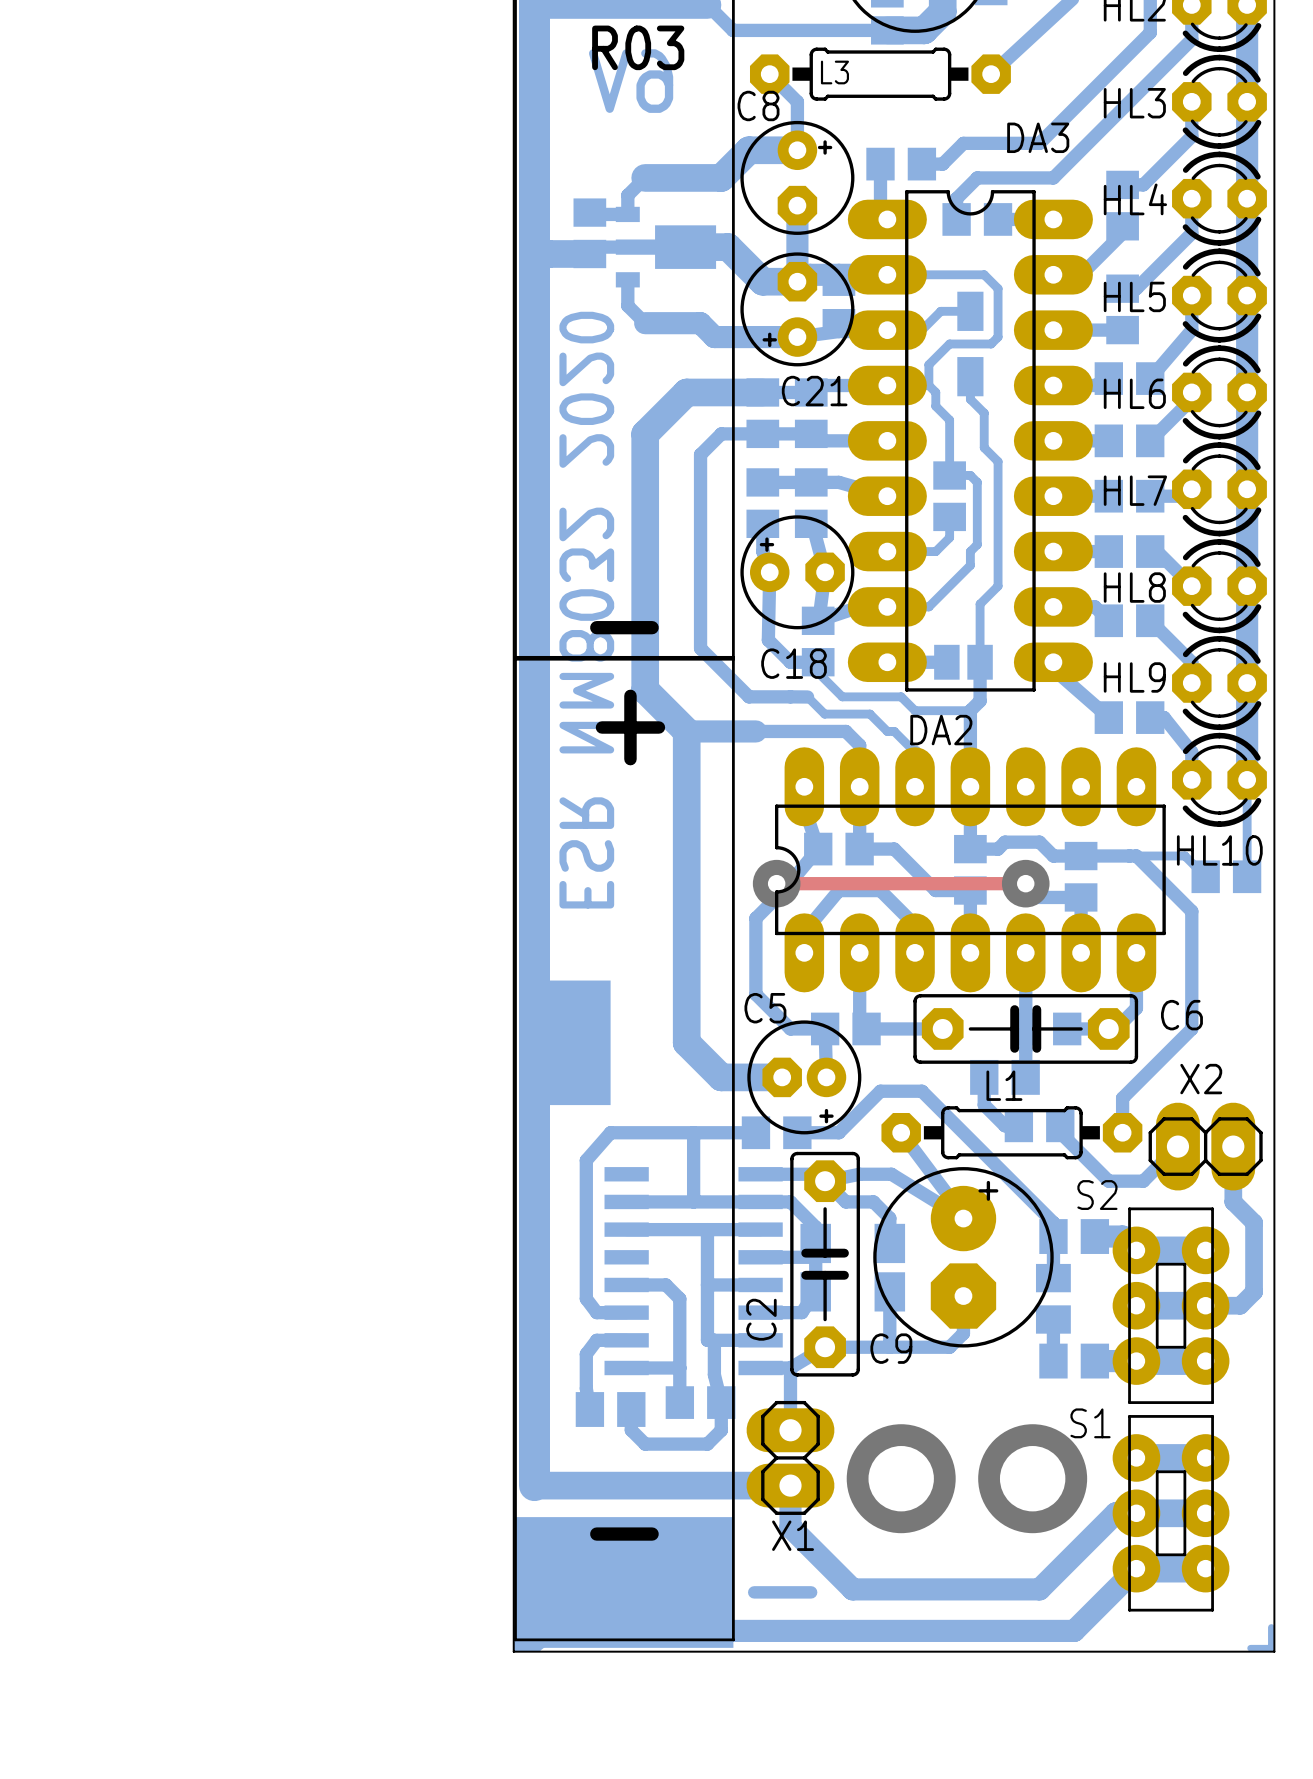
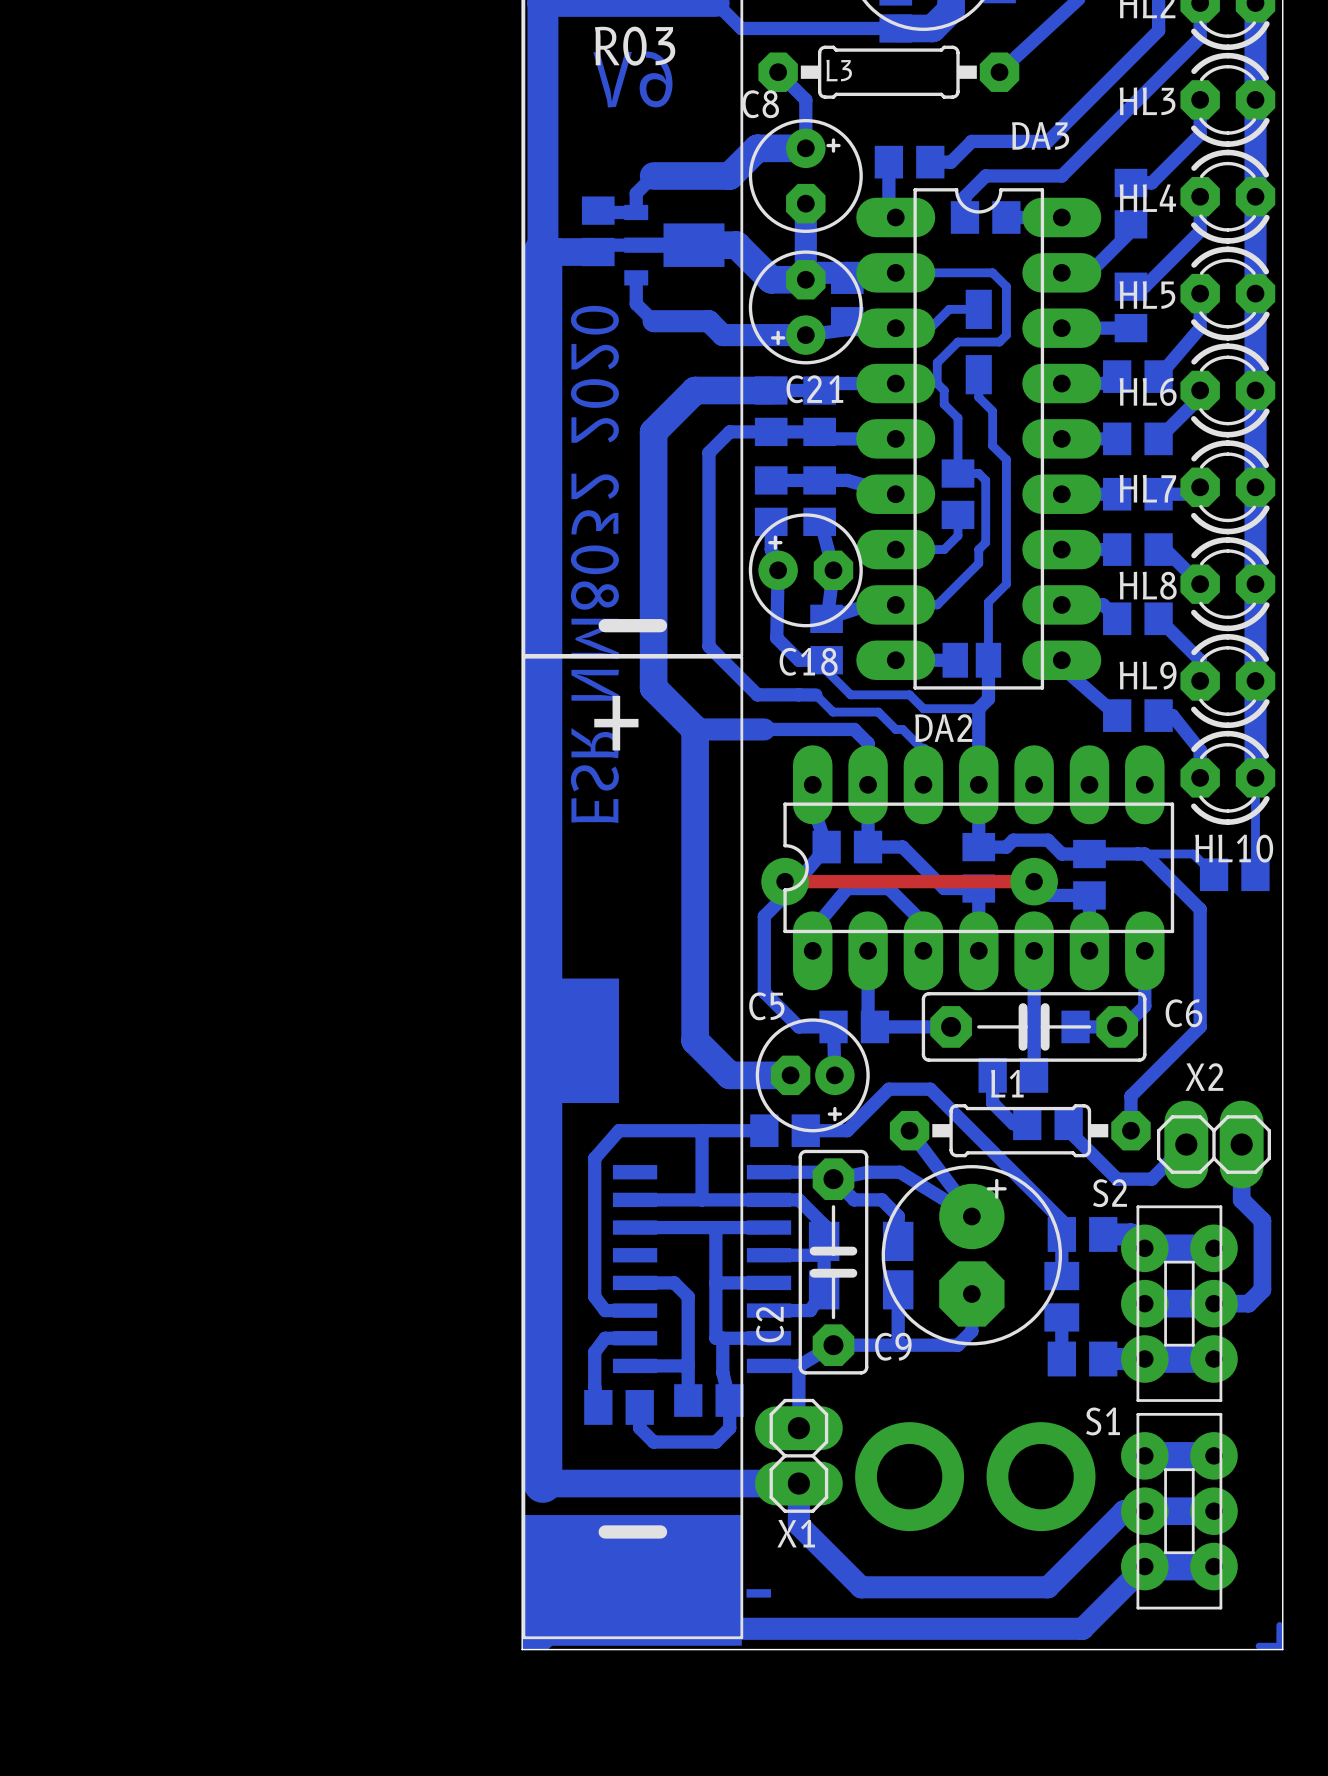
bottom track width: thin (534, 254) (534, 1485) -> thick (542, 252) (542, 1483)

